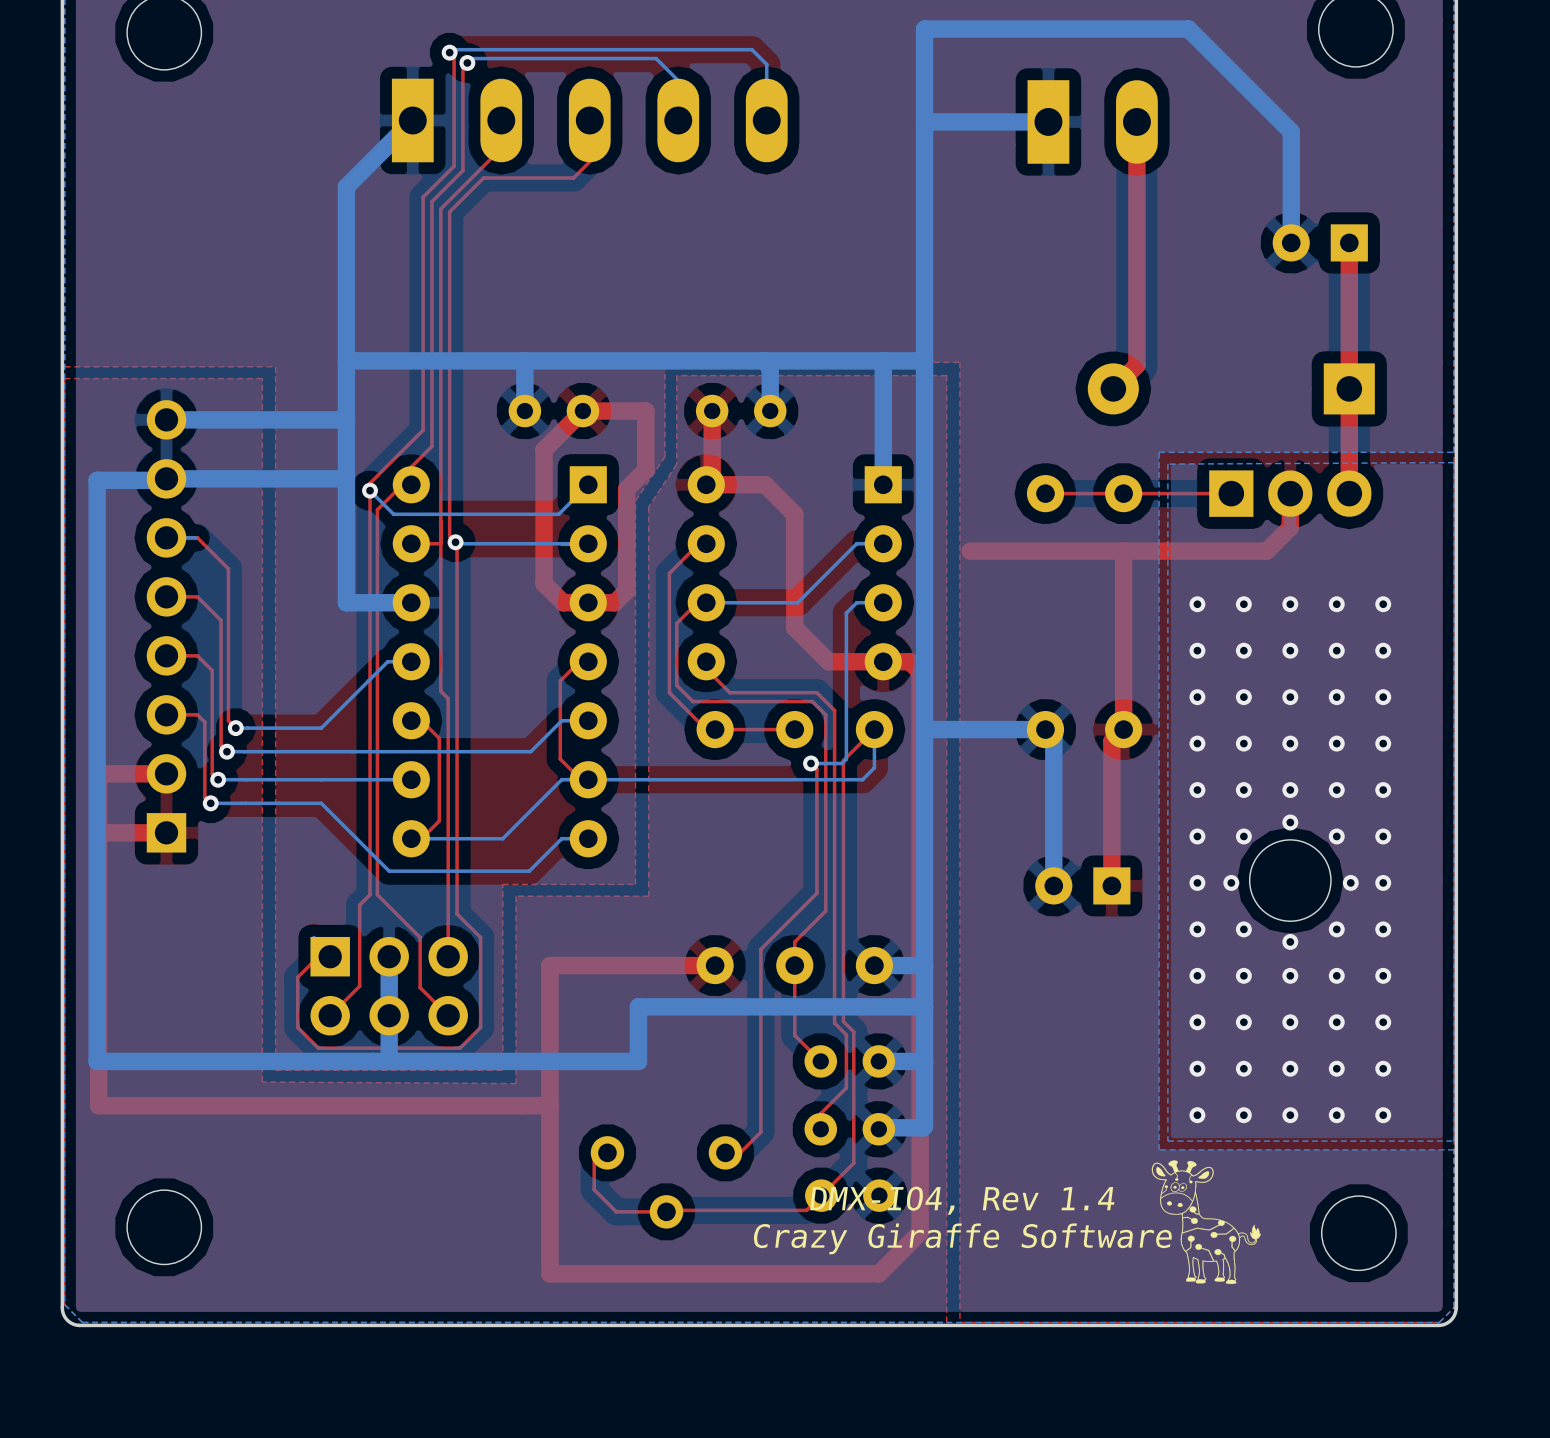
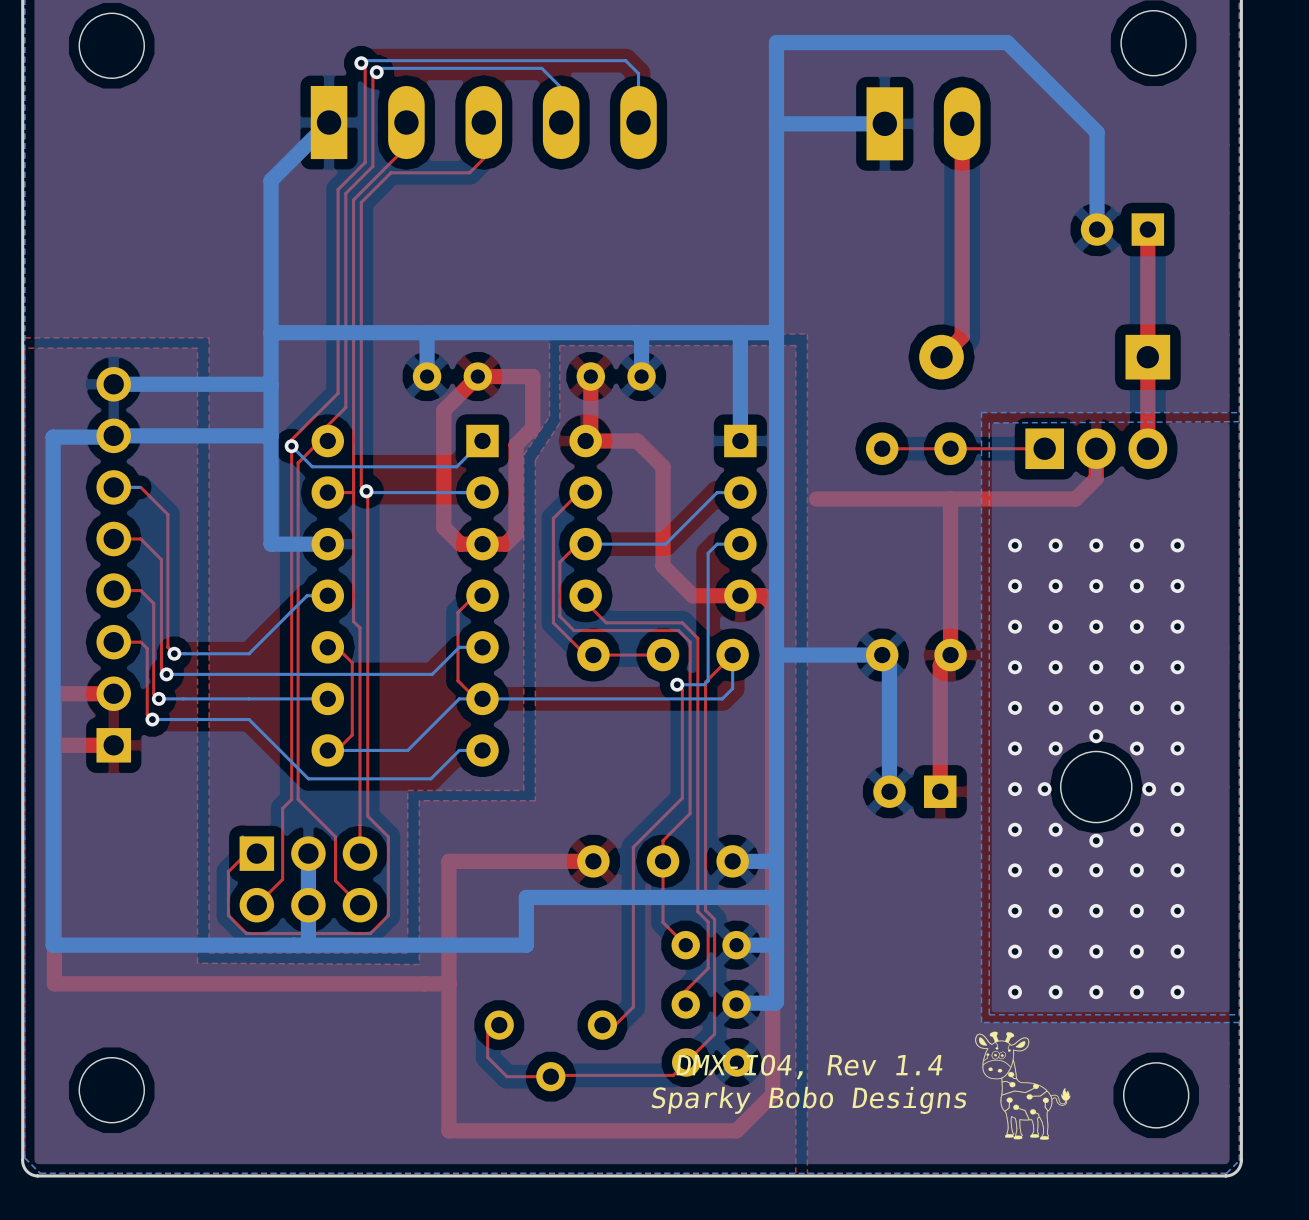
text: Crazy Giraffe Software (962, 1238) -> Sparky Bobo Designs (809, 1100)

